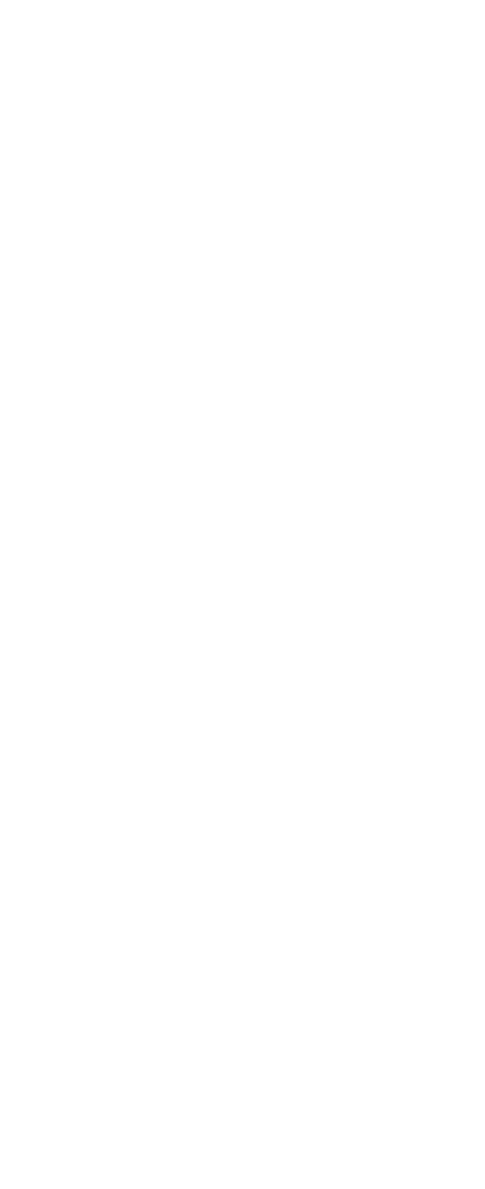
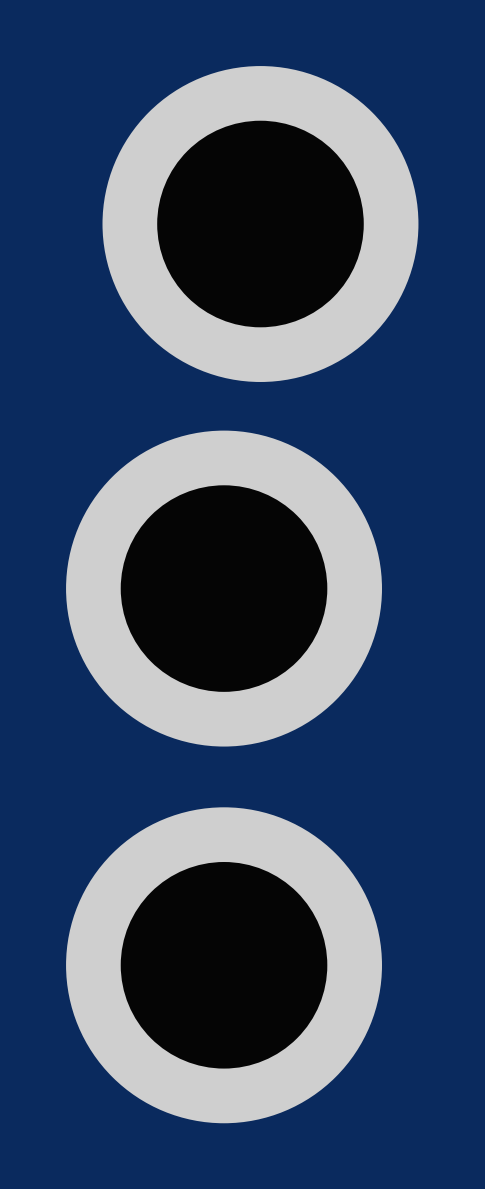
part: none -> (260, 224)
part: none -> (224, 588)
part: none -> (224, 965)

